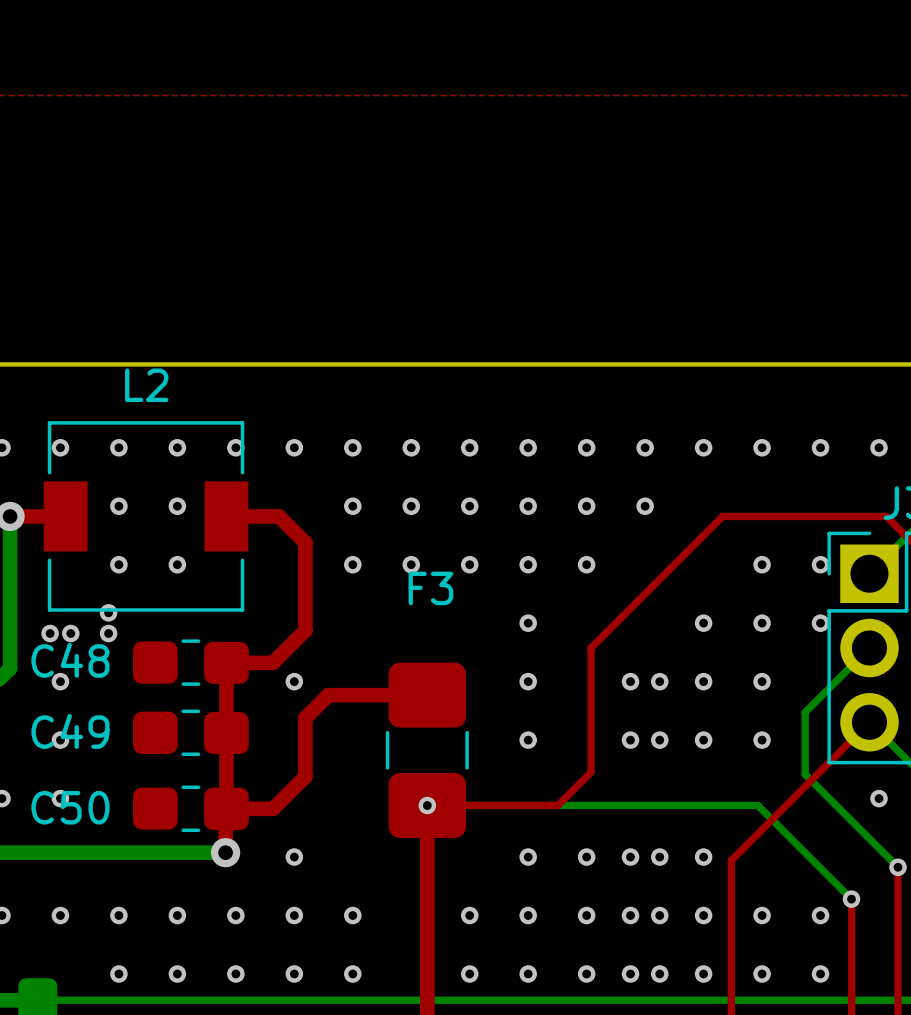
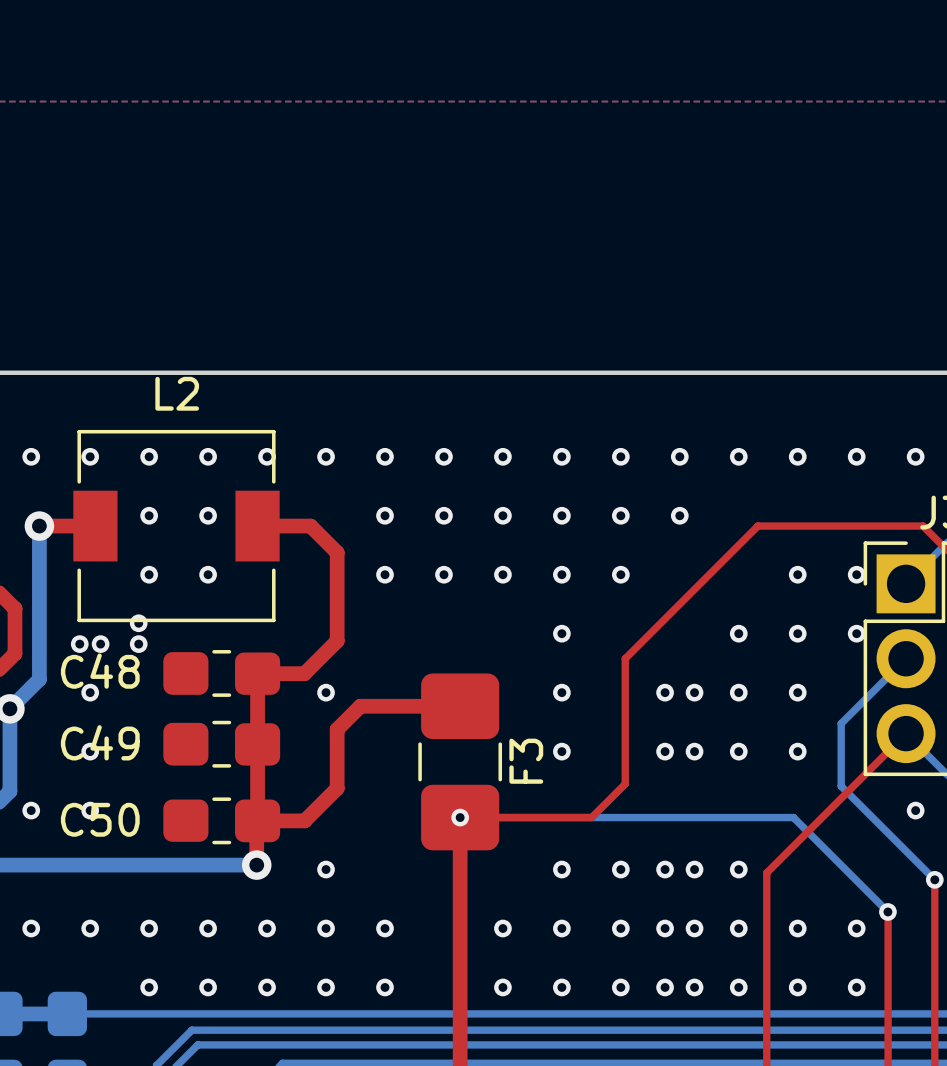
F3 name rotation: 0° (430, 588) -> 90° counterclockwise (526, 761)
F3 name position: F3 (430, 588) -> F3 (526, 761)

